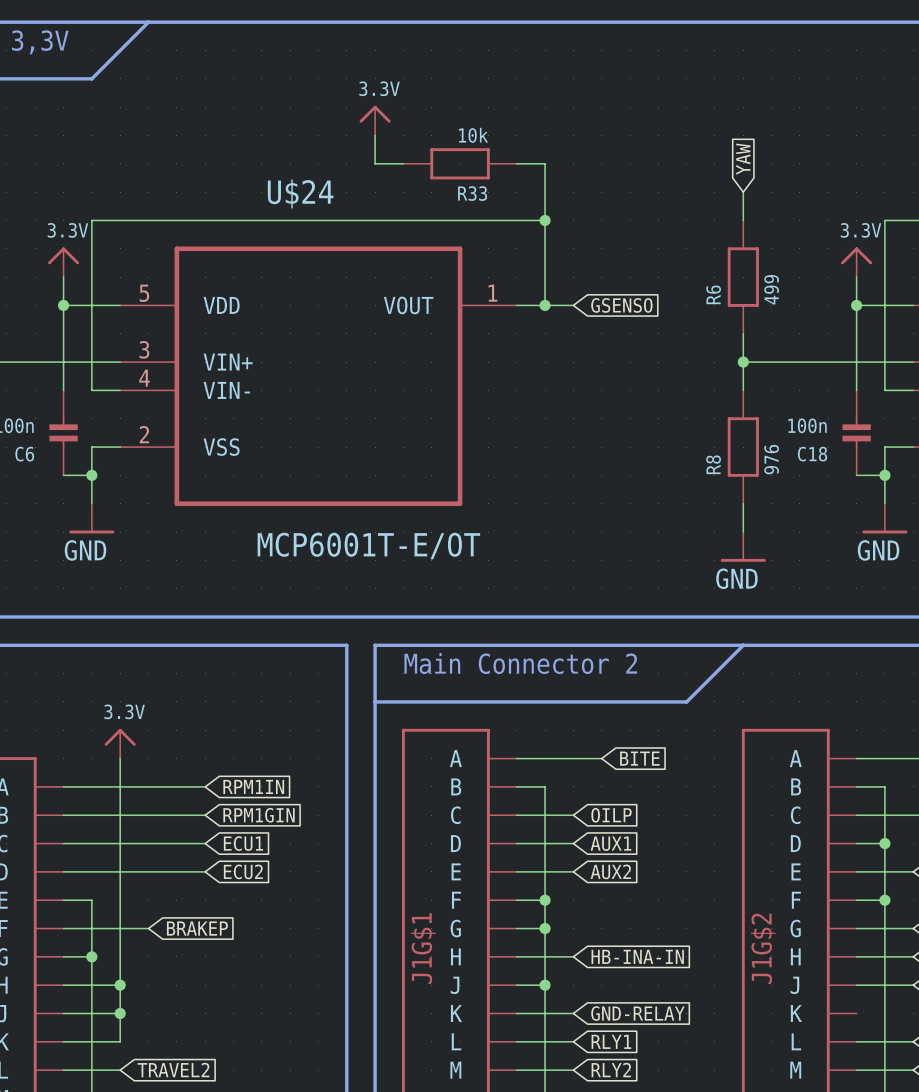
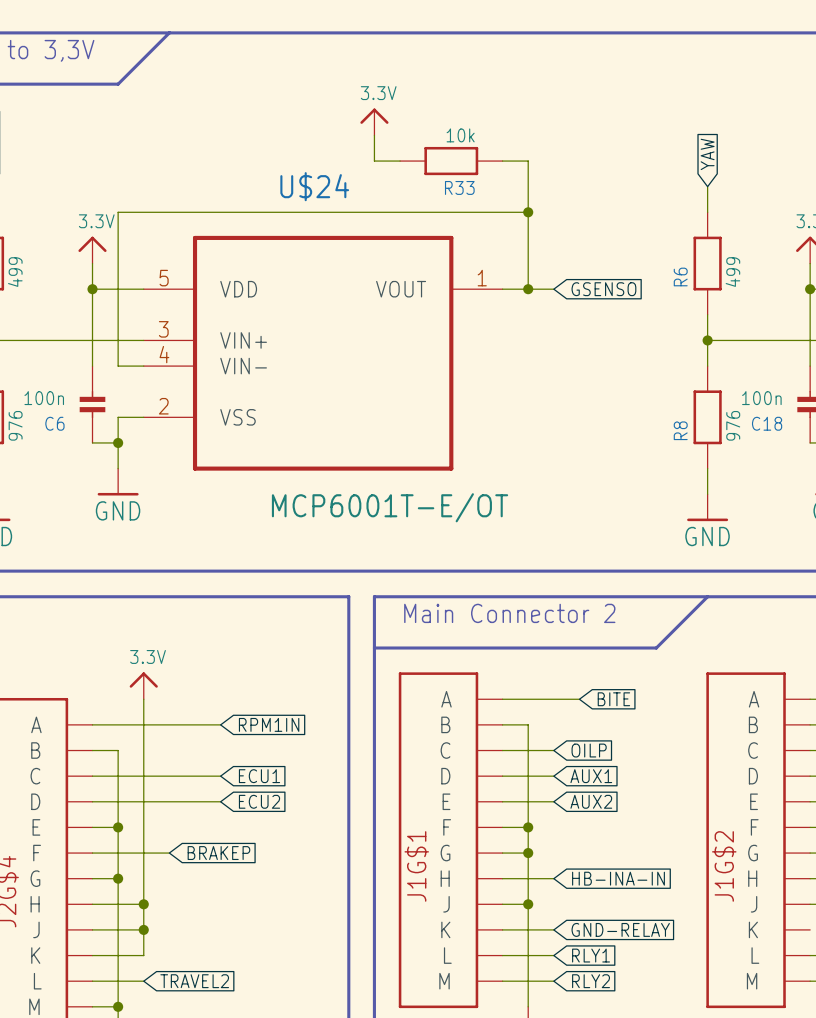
wire: (91, 815) (205, 815) -> (118, 750) (118, 827)
global label: RPM1GIN (259, 815) -> none
junction: none -> (118, 827)

